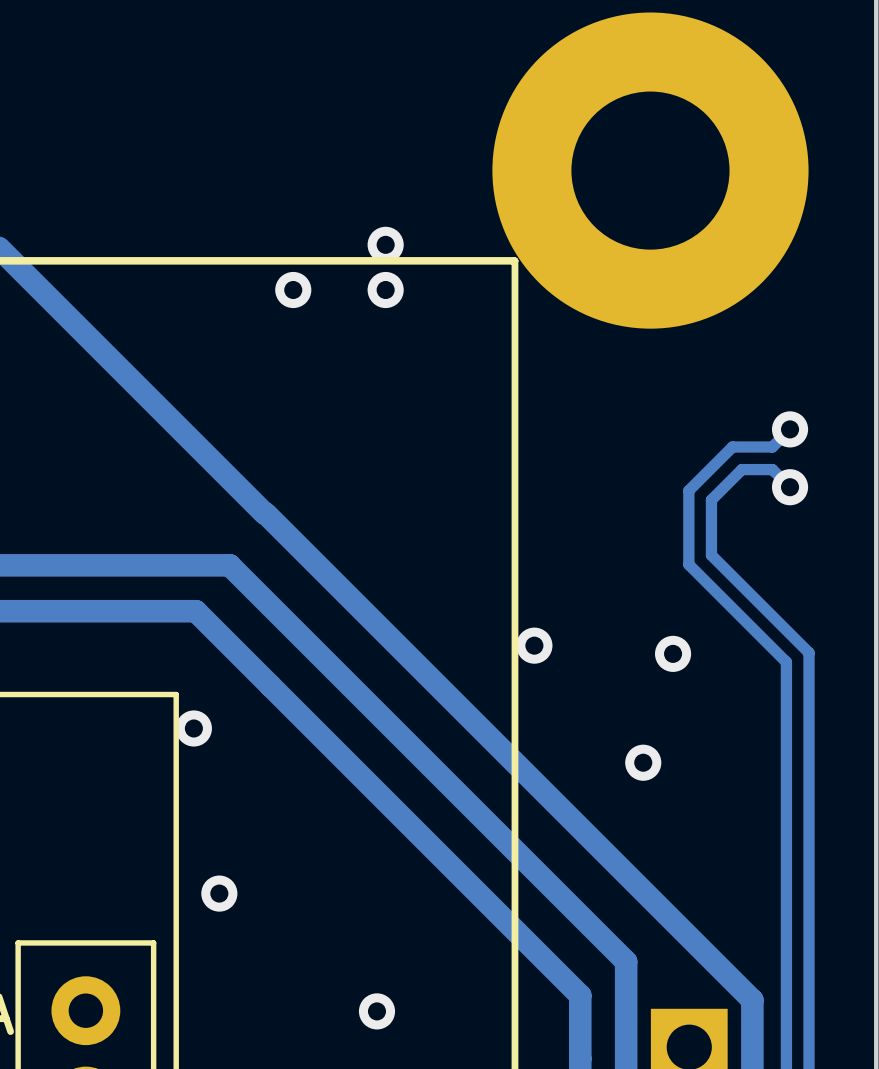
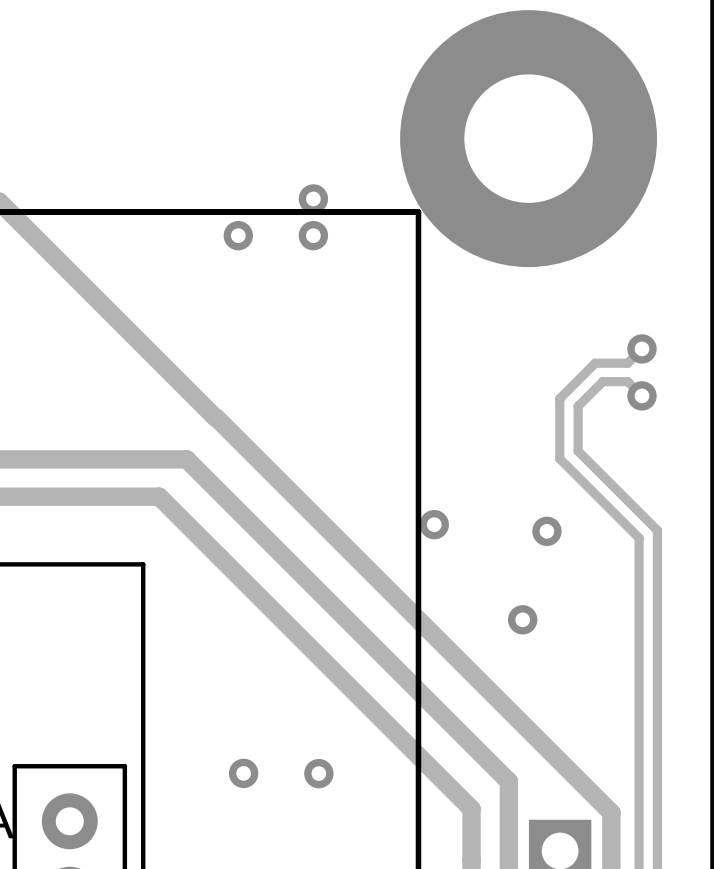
via: (193, 728) -> none
via: (219, 893) -> none
via: none -> (243, 773)
via: none -> (318, 773)
via: (376, 1011) -> none

